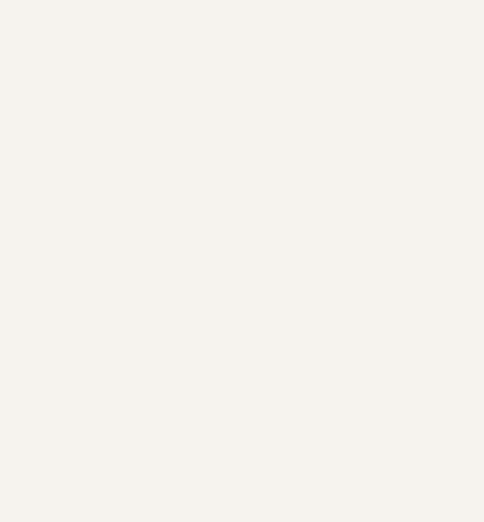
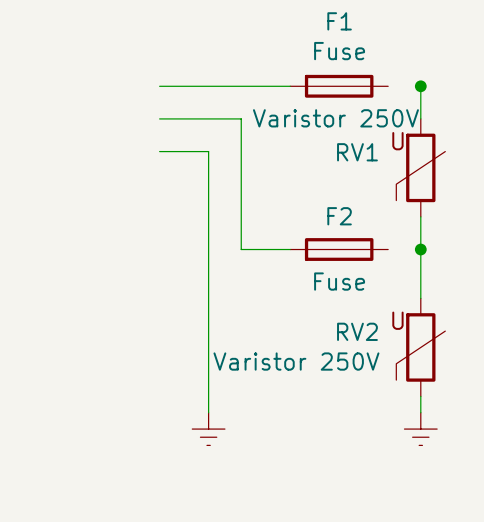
wire: none -> (159, 86) (290, 86)
F1: none -> Fuse (339, 86)
wire: none -> (420, 86) (420, 118)
junction: none -> (420, 86)
wire: none -> (159, 118) (241, 118) (241, 249) (290, 249)
wire: none -> (159, 151) (208, 151) (208, 412)
RV1: none -> Varistor 250V (420, 167)
wire: none -> (420, 216) (420, 298)
F2: none -> Fuse (339, 249)
junction: none -> (420, 249)
RV2: none -> Varistor 250V (420, 347)
wire: none -> (420, 396) (420, 412)
power symbol: none -> (208, 429)
power symbol: none -> (420, 429)

